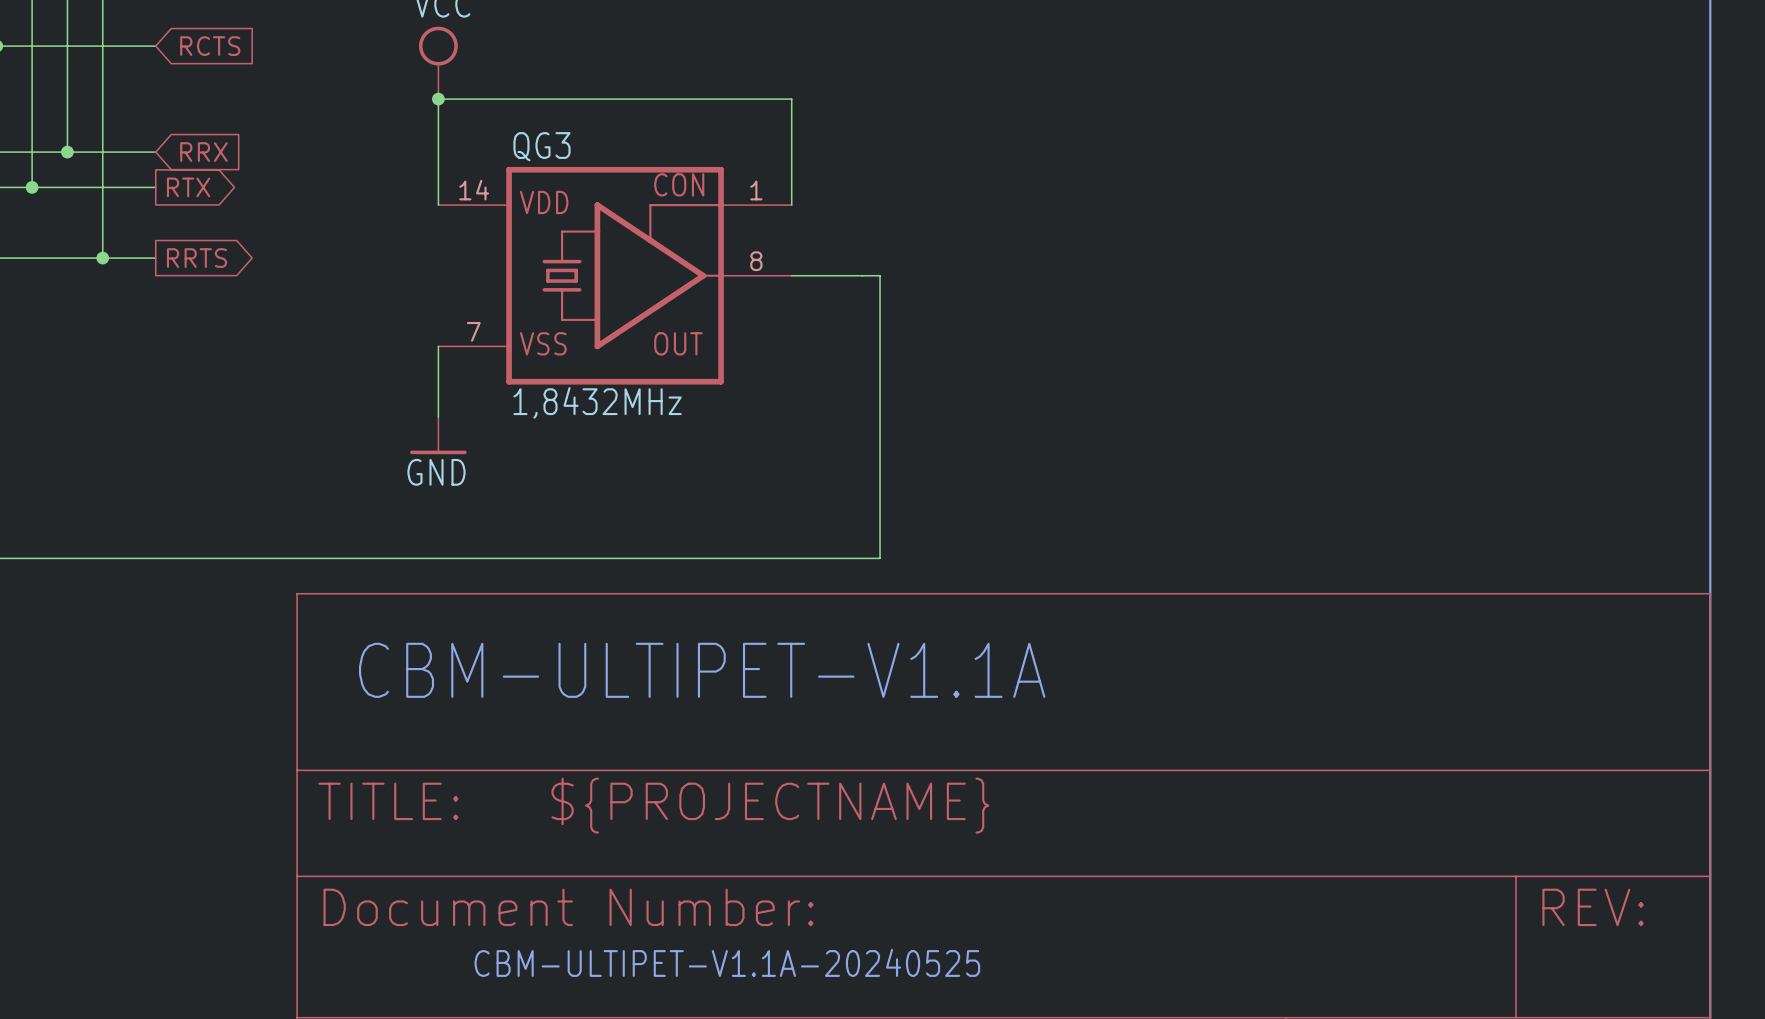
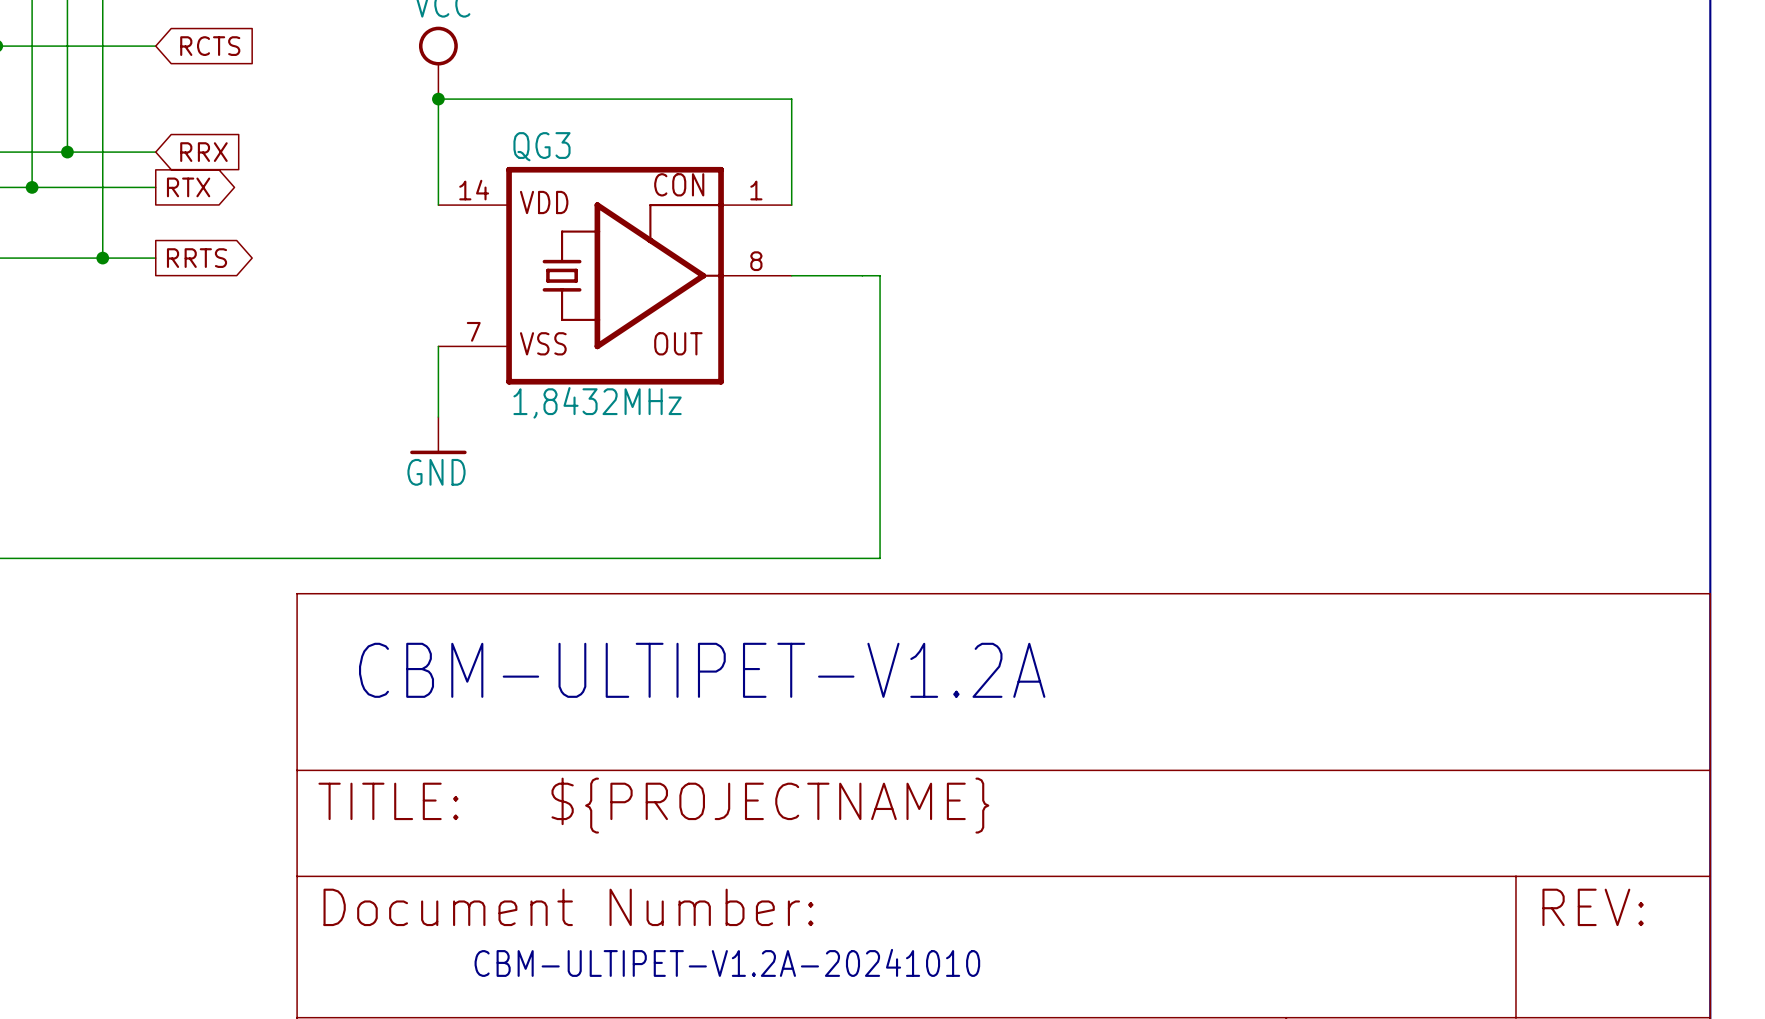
text: CBM-ULTIPET-V1.1A (702, 670) -> CBM-ULTIPET-V1.2A (702, 670)
text: CBM-ULTIPET-V1.1A-20240525 (727, 962) -> CBM-ULTIPET-V1.2A-20241010 (727, 962)

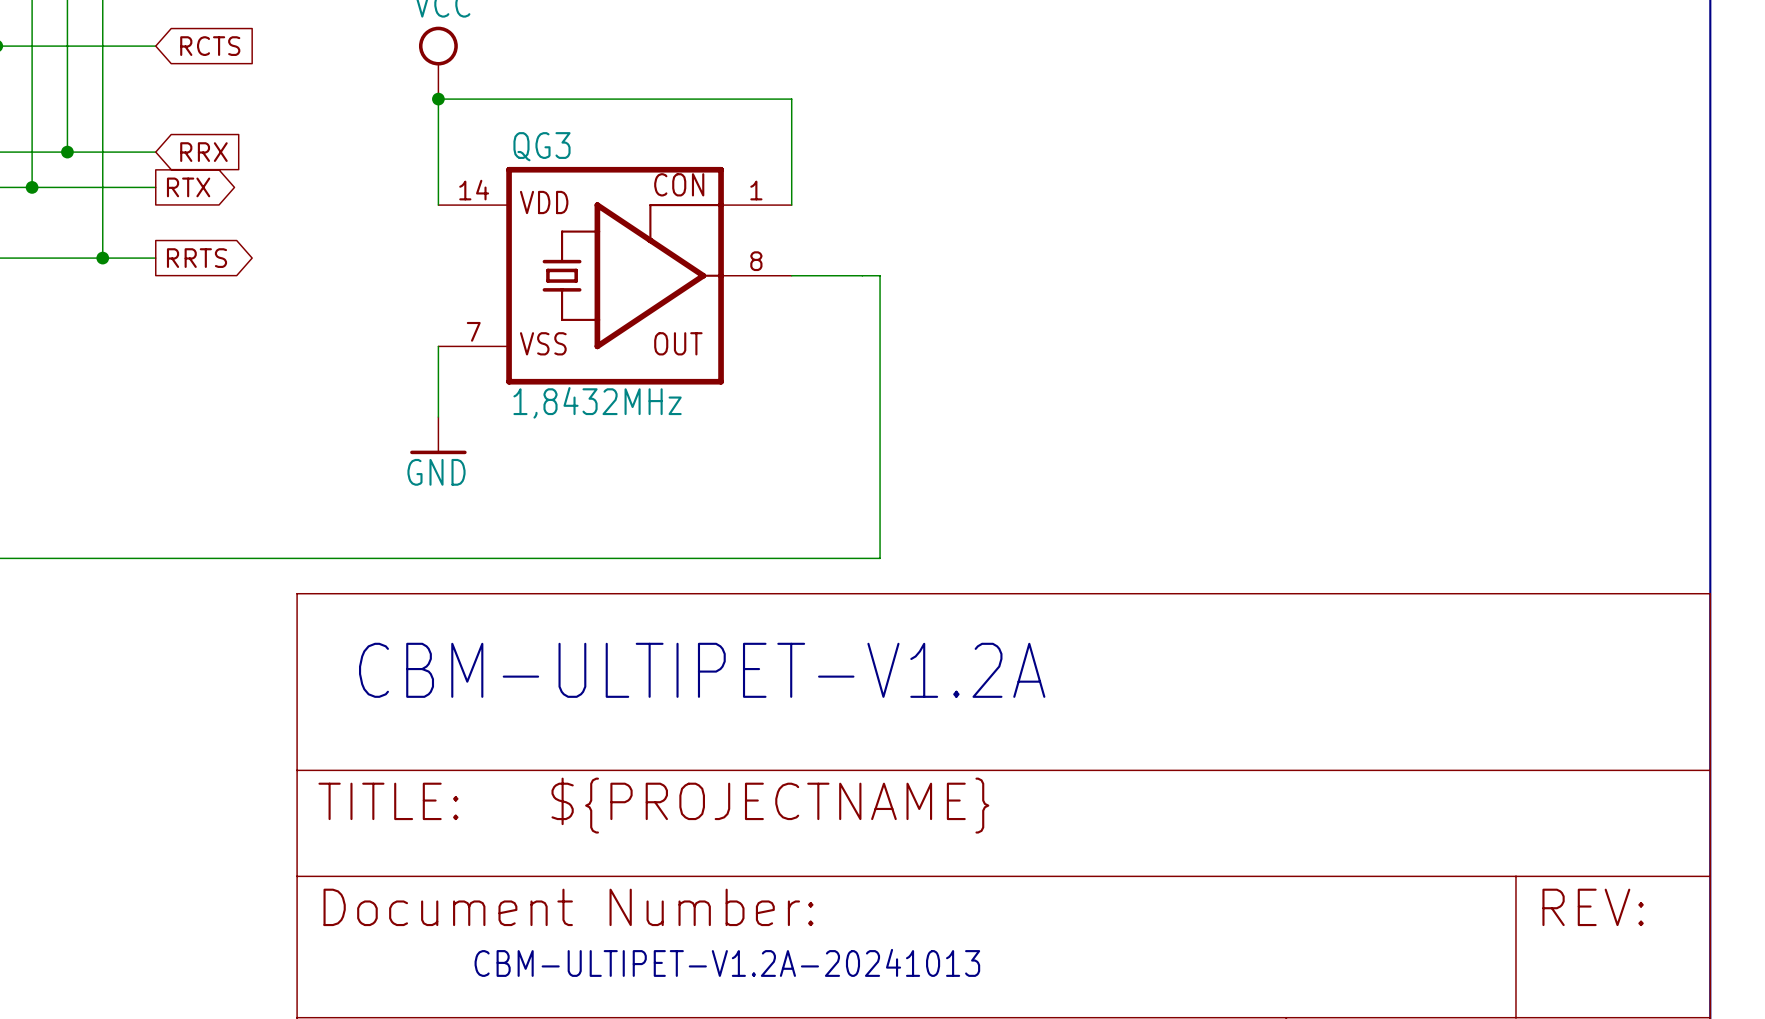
text: CBM-ULTIPET-V1.2A-20241010 (727, 962) -> CBM-ULTIPET-V1.2A-20241013 (727, 962)

